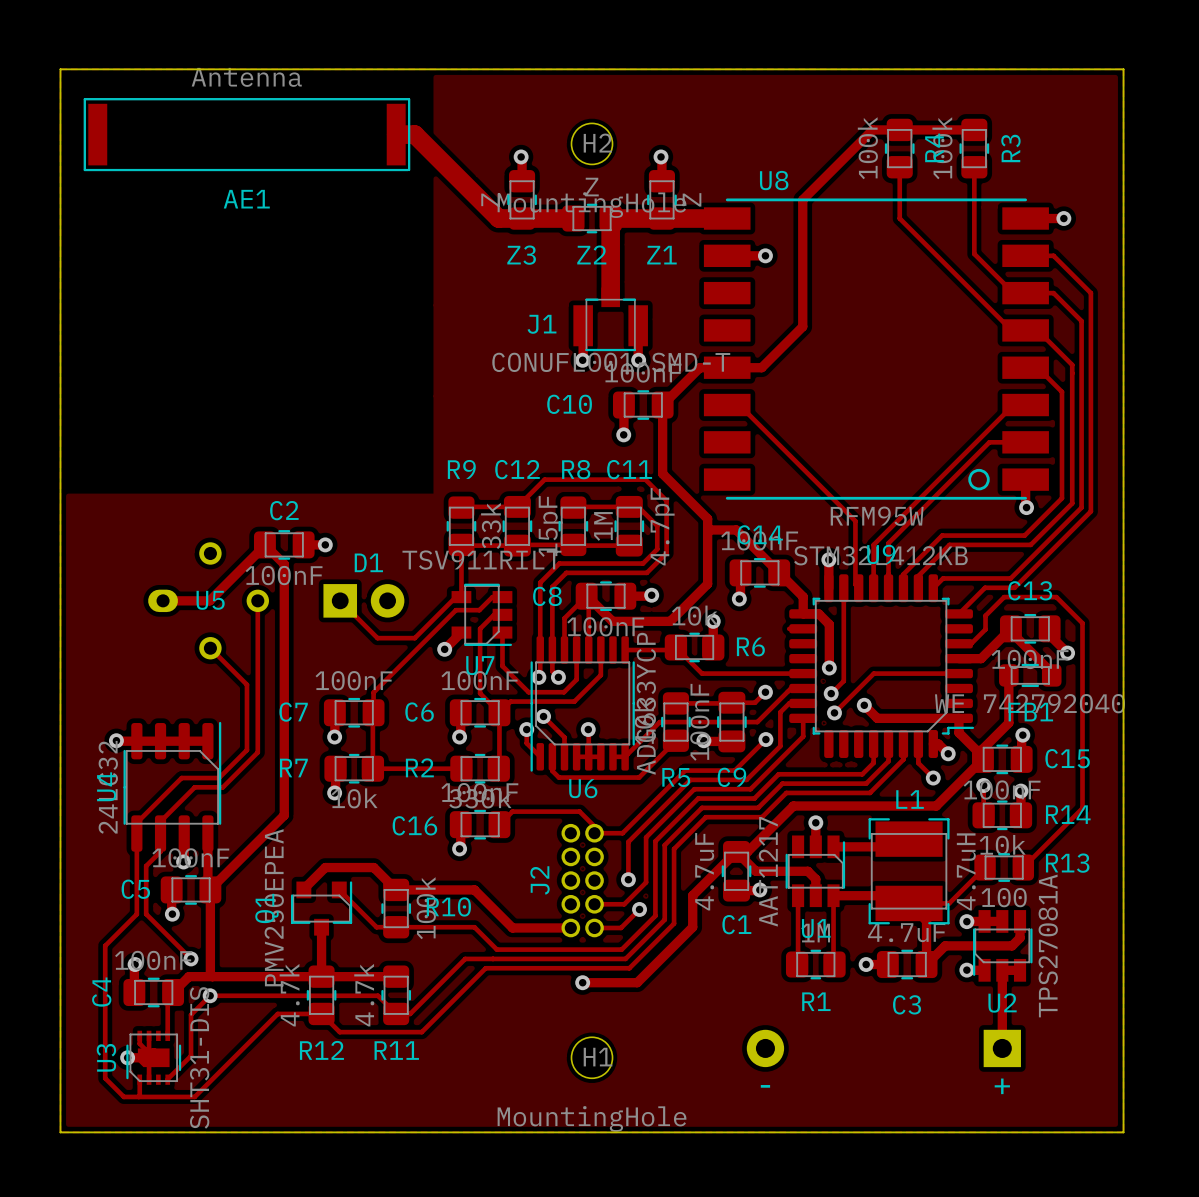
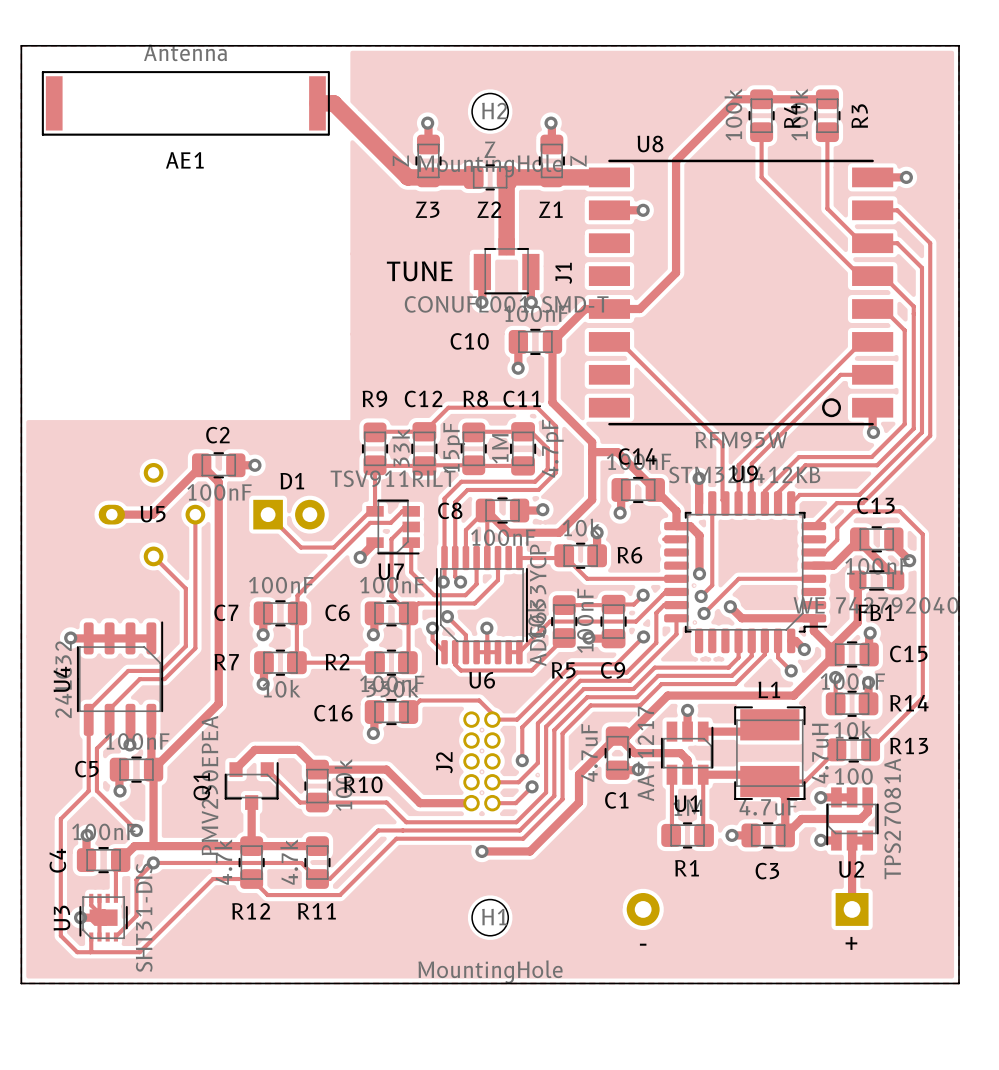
J1 name rotation: 0° (542, 324) -> 90° counterclockwise (563, 273)
J1 name position: J1 (542, 324) -> J1 (563, 273)
text: none -> TUNE (419, 271)

